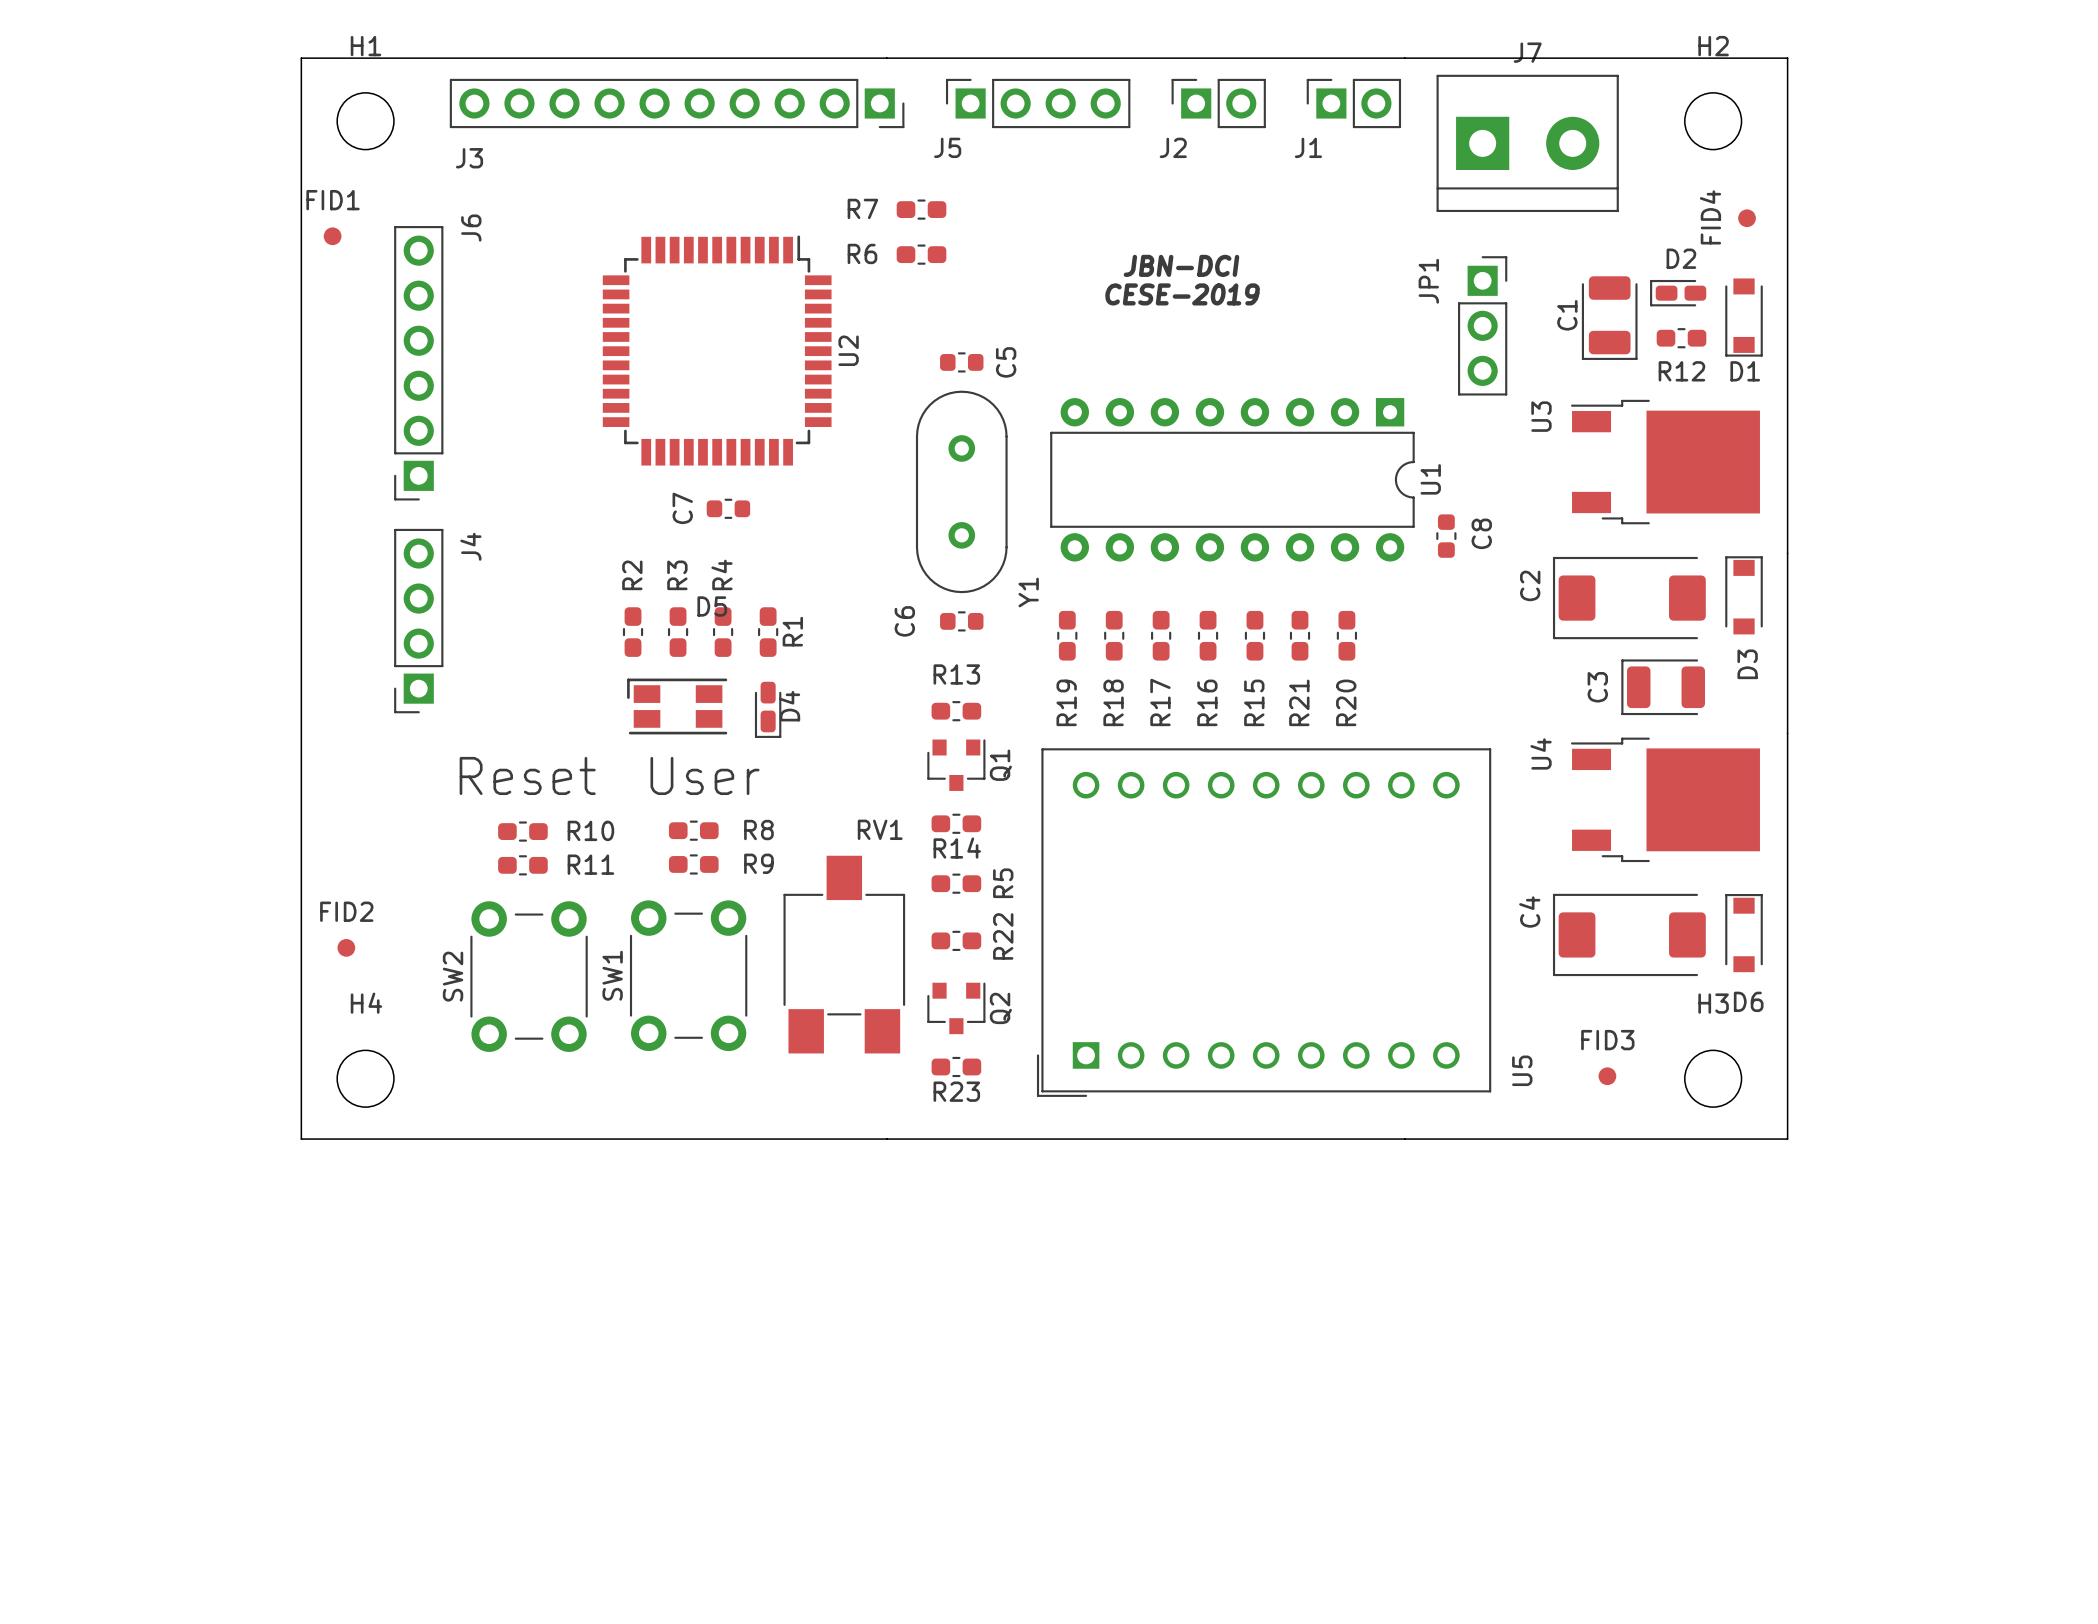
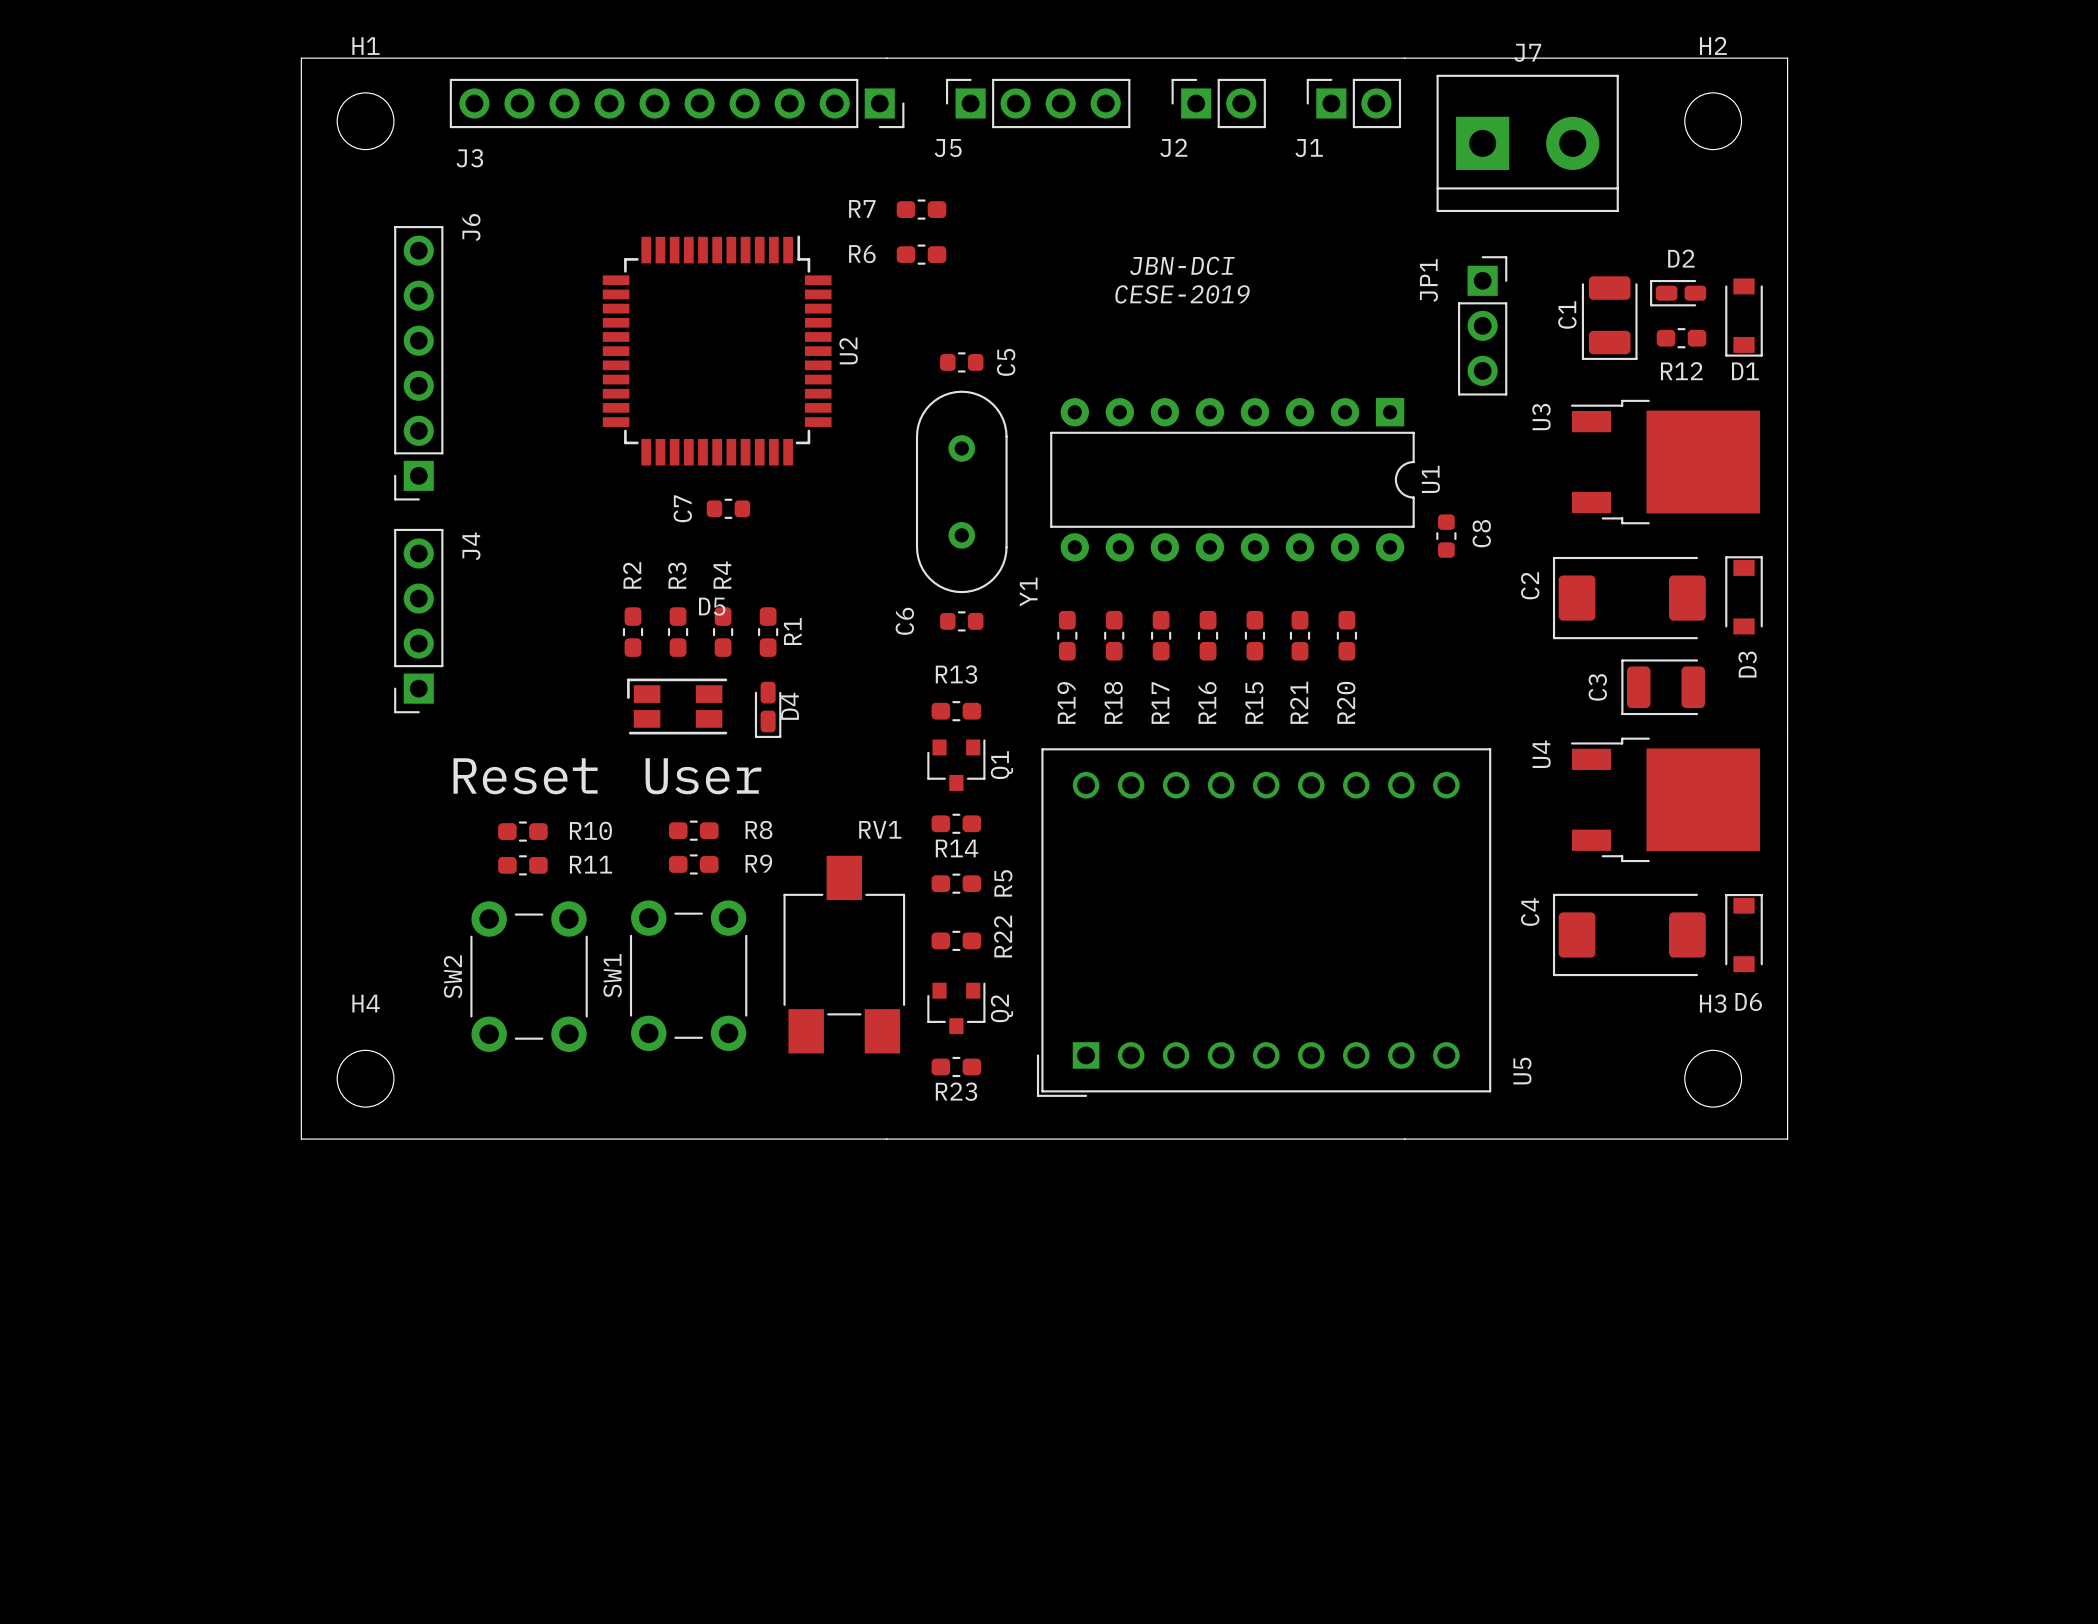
FID4: (1747, 218) -> none
FID1: (332, 236) -> none
FID2: (346, 947) -> none
FID3: (1607, 1076) -> none

